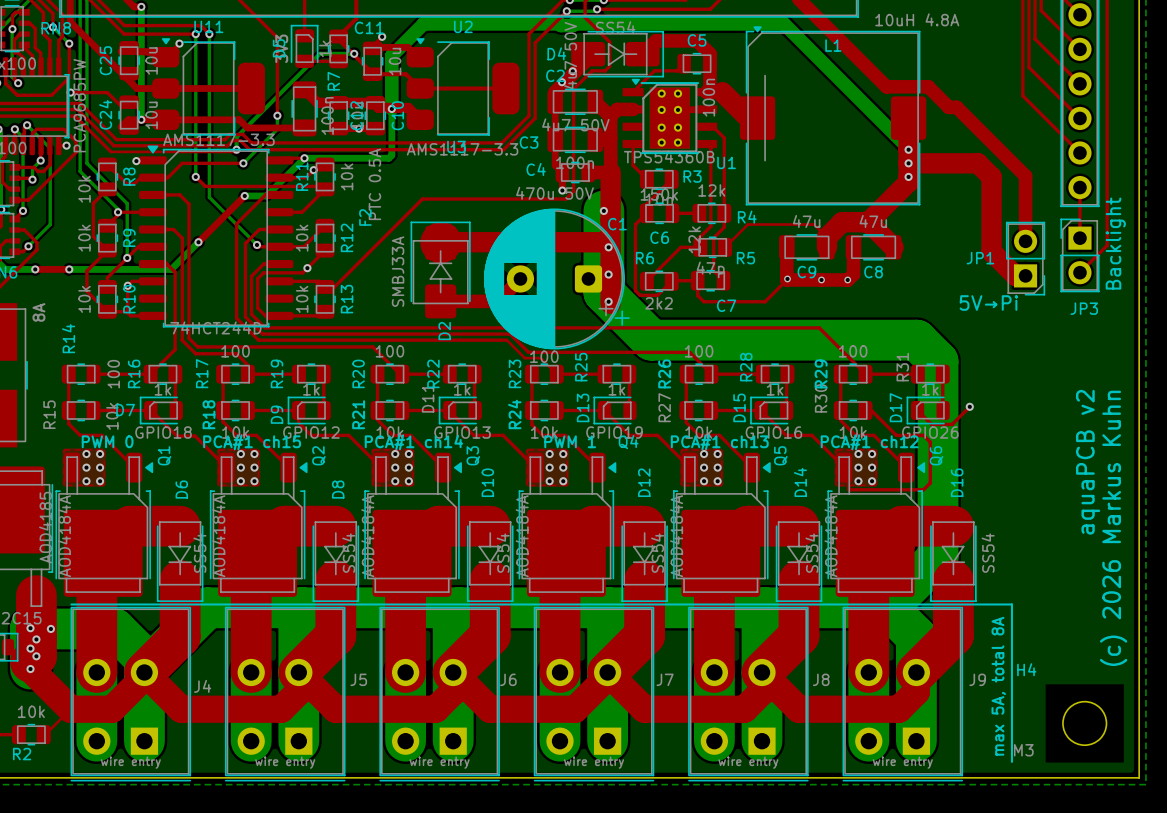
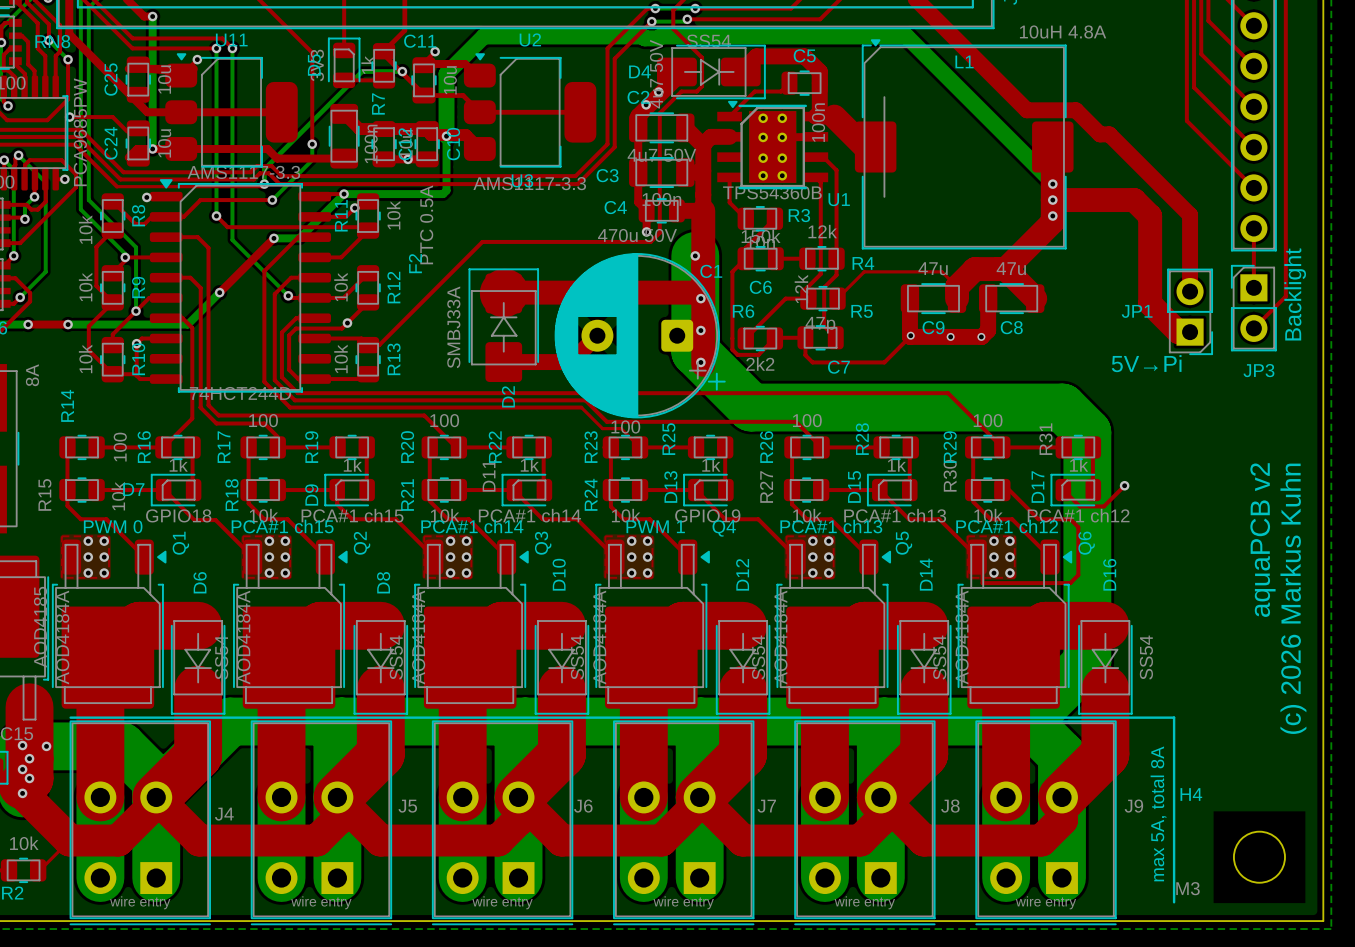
D9 value: GPIO12 (311, 432) -> PCA#1 ch15 (352, 515)
D11 value: GPIO13 (462, 432) -> PCA#1 ch14 (529, 515)
D15 value: GPIO16 (773, 432) -> PCA#1 ch13 (895, 515)
D17 value: GPIO26 (930, 432) -> PCA#1 ch12 (1078, 515)

